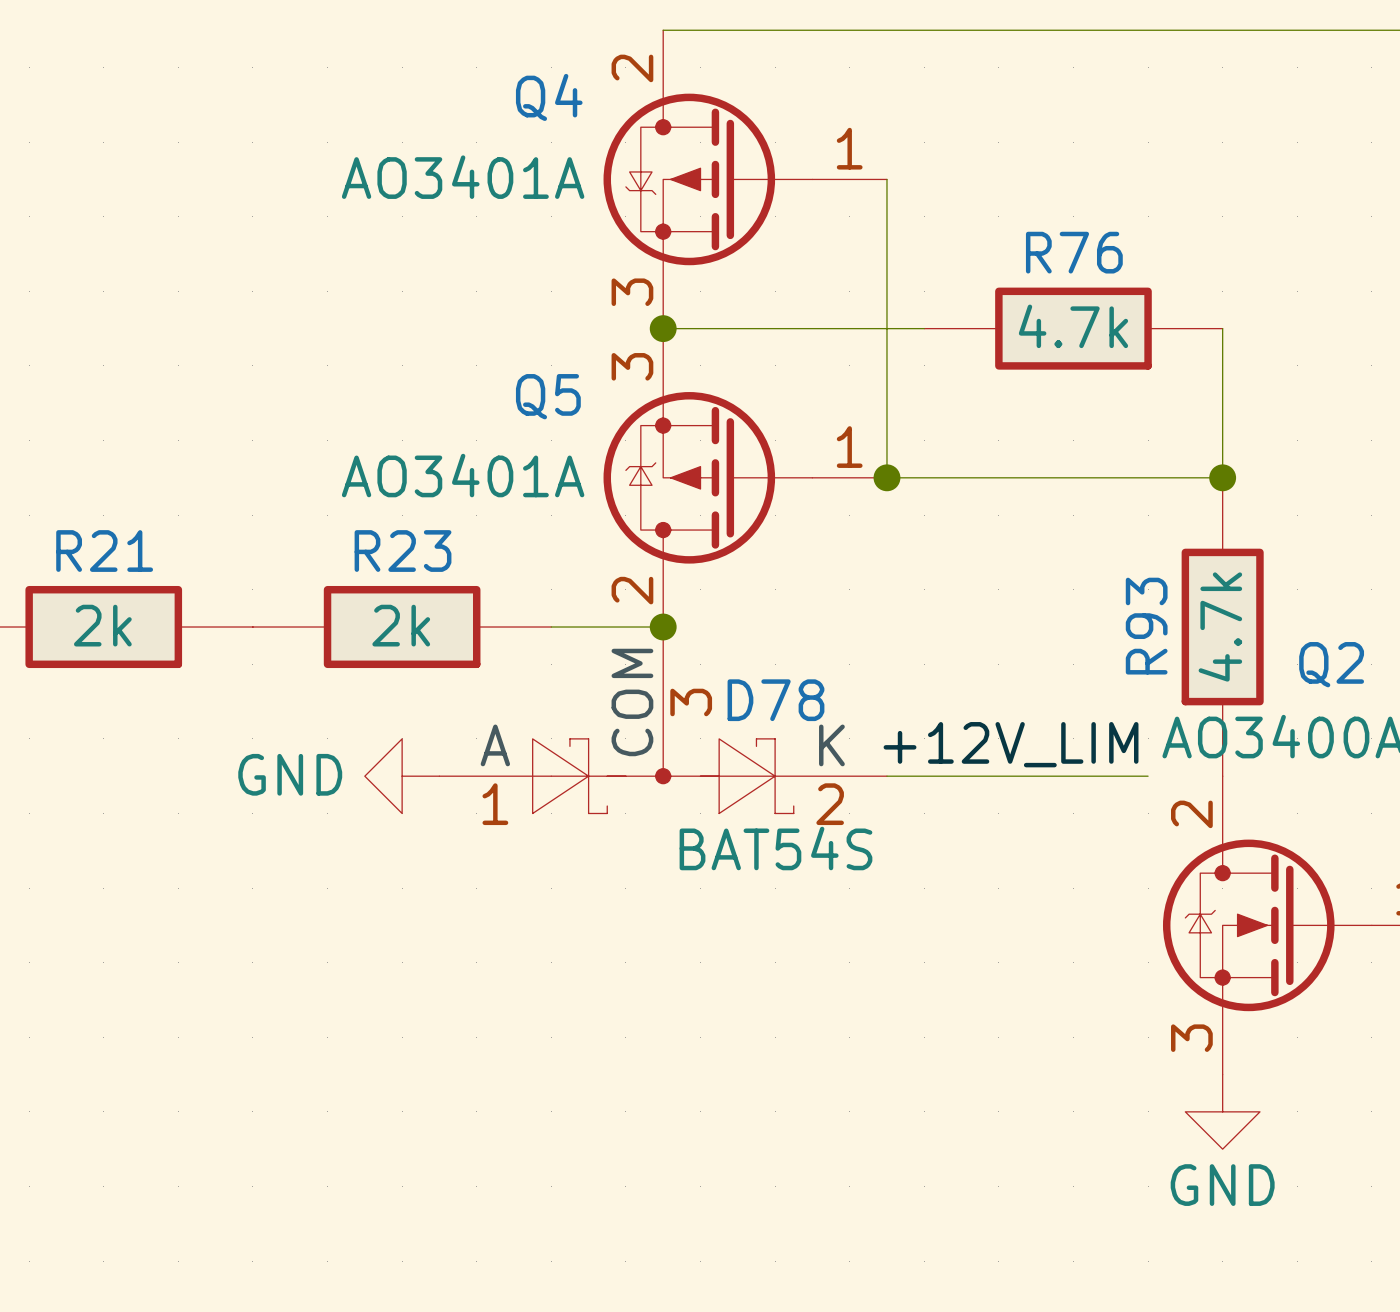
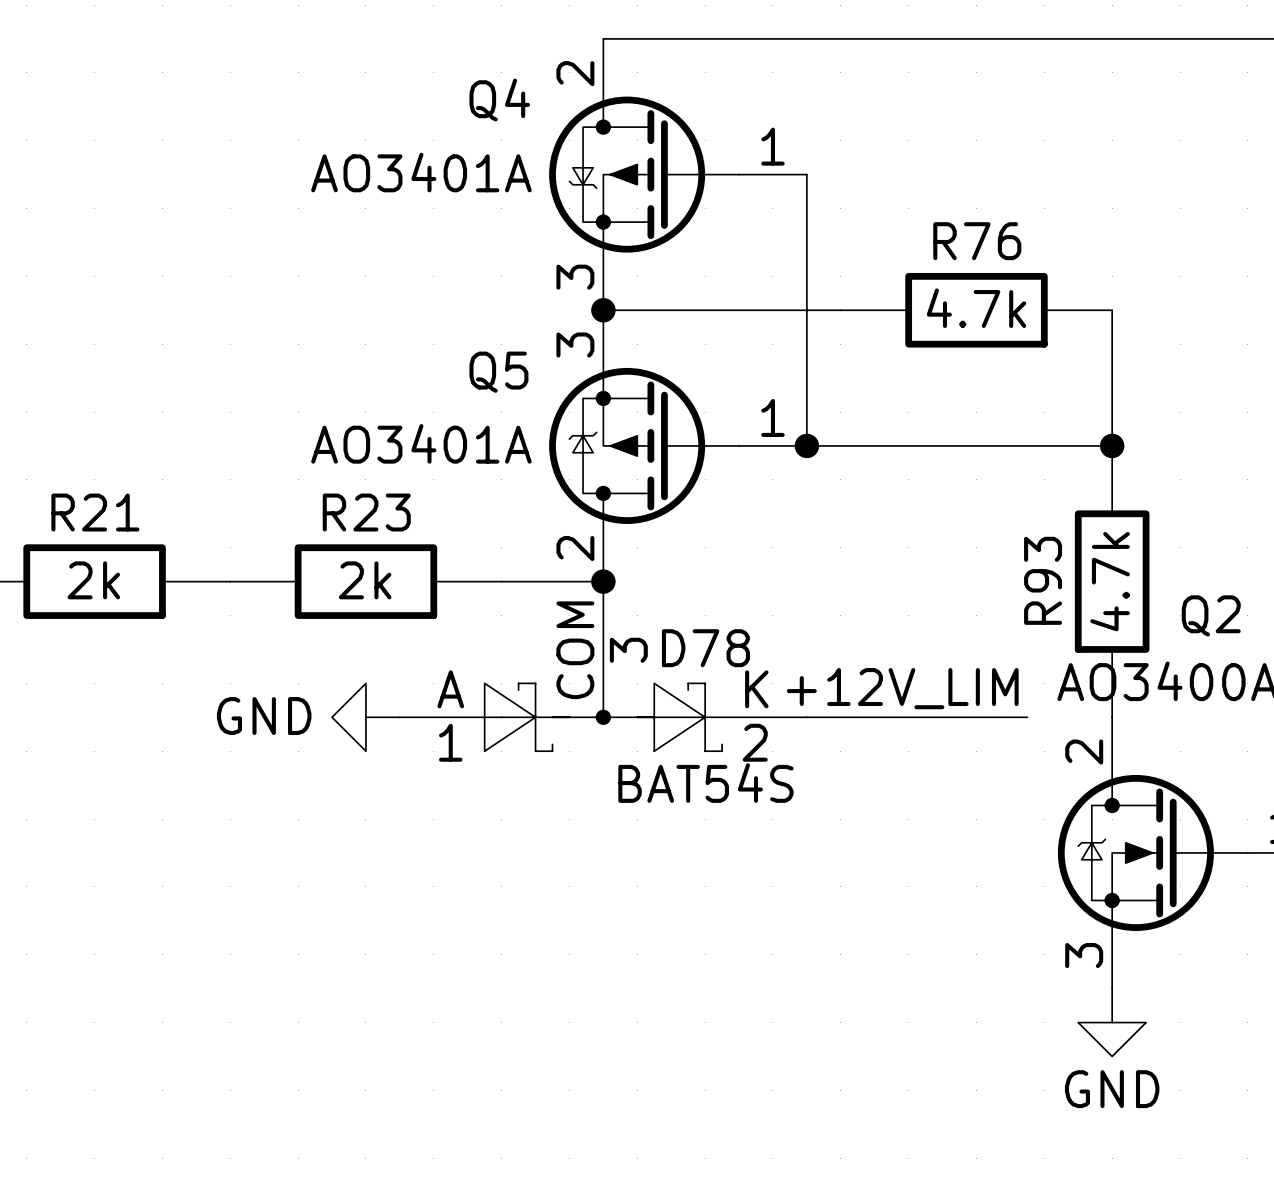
label position: +12V_LIM (1011, 744) -> +12V_LIM (902, 688)
wire: (1129, 776) (1148, 776) -> none

